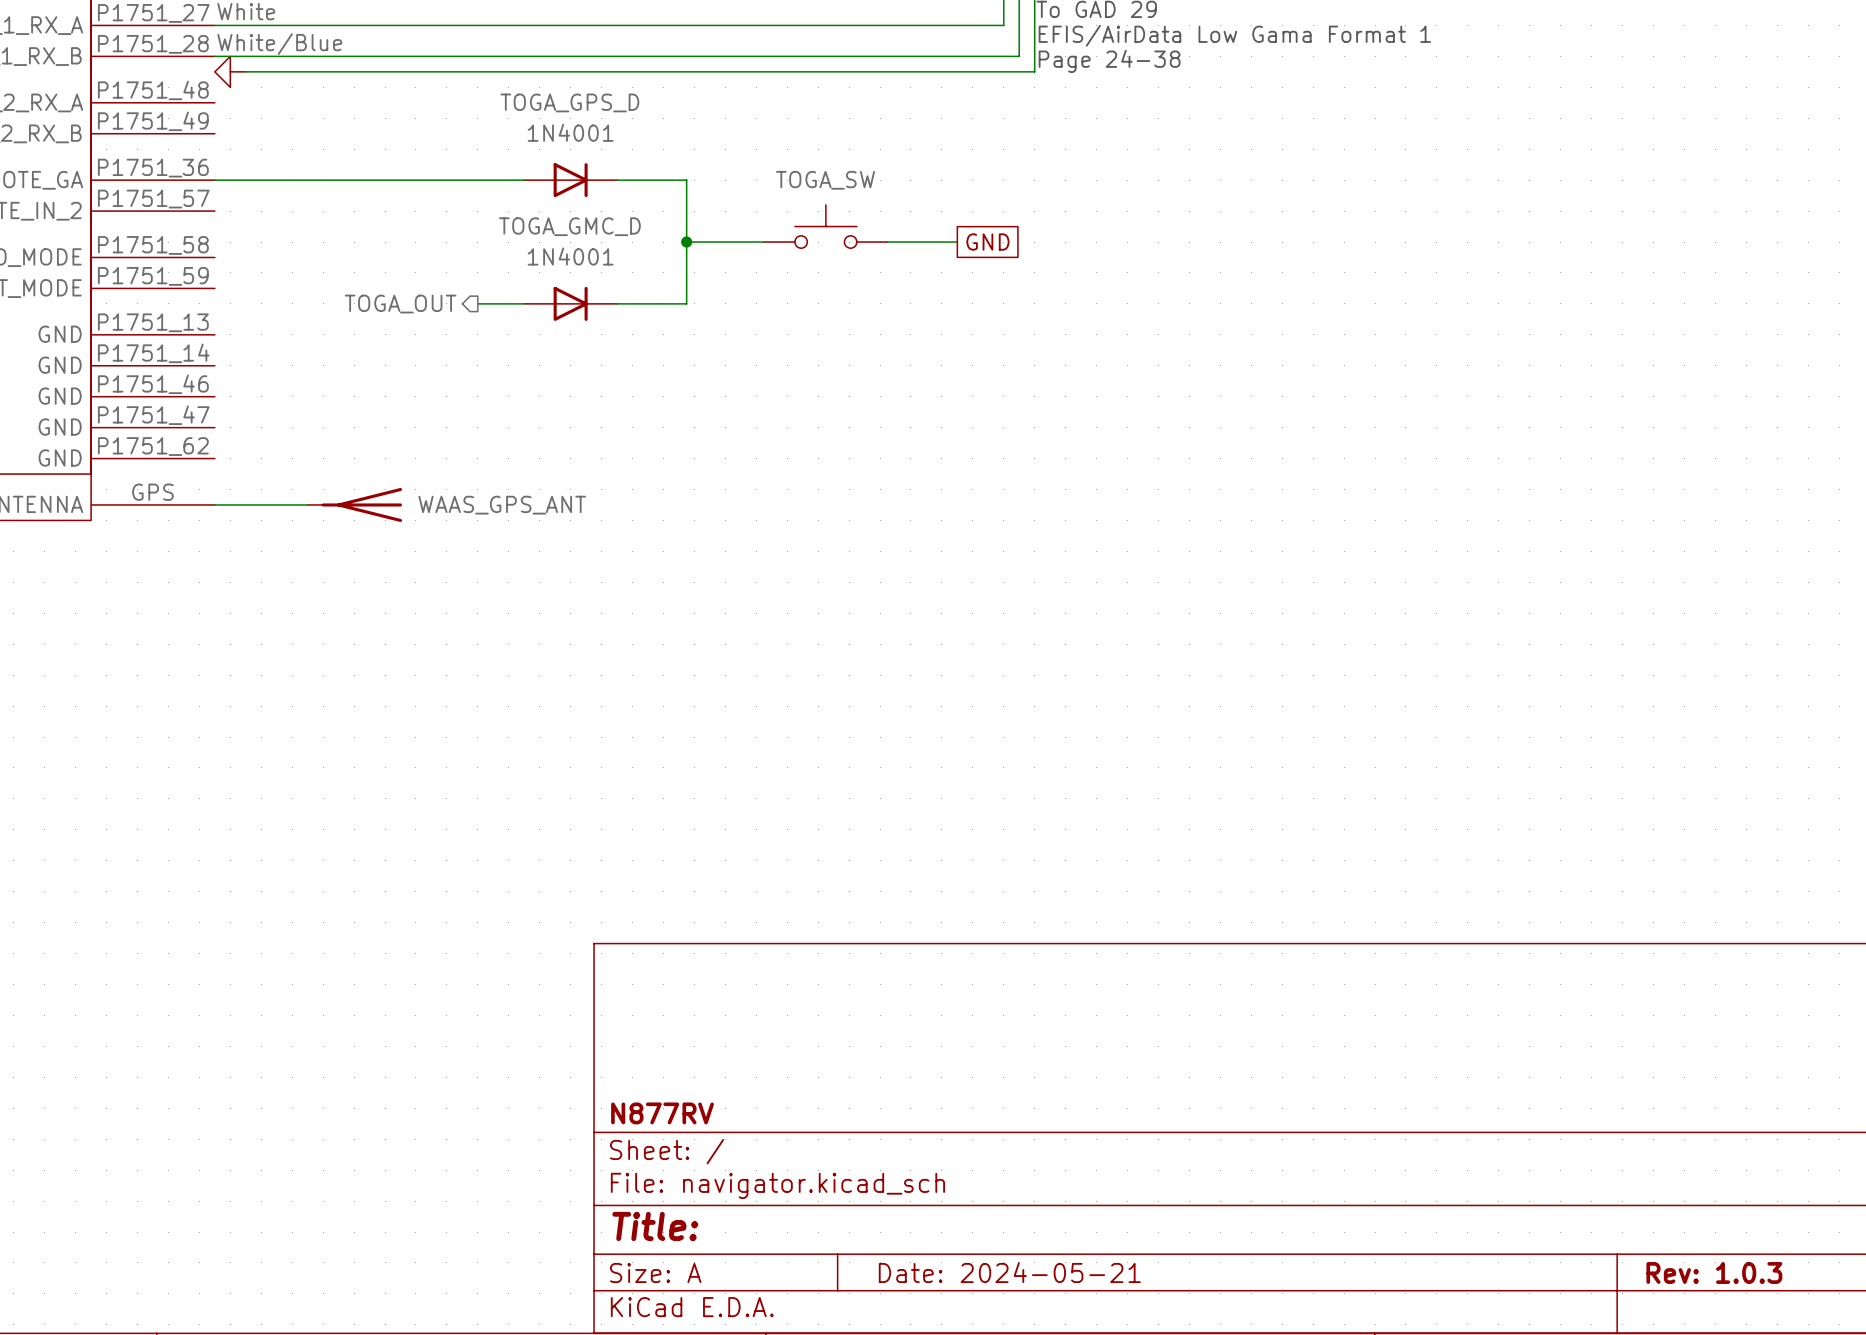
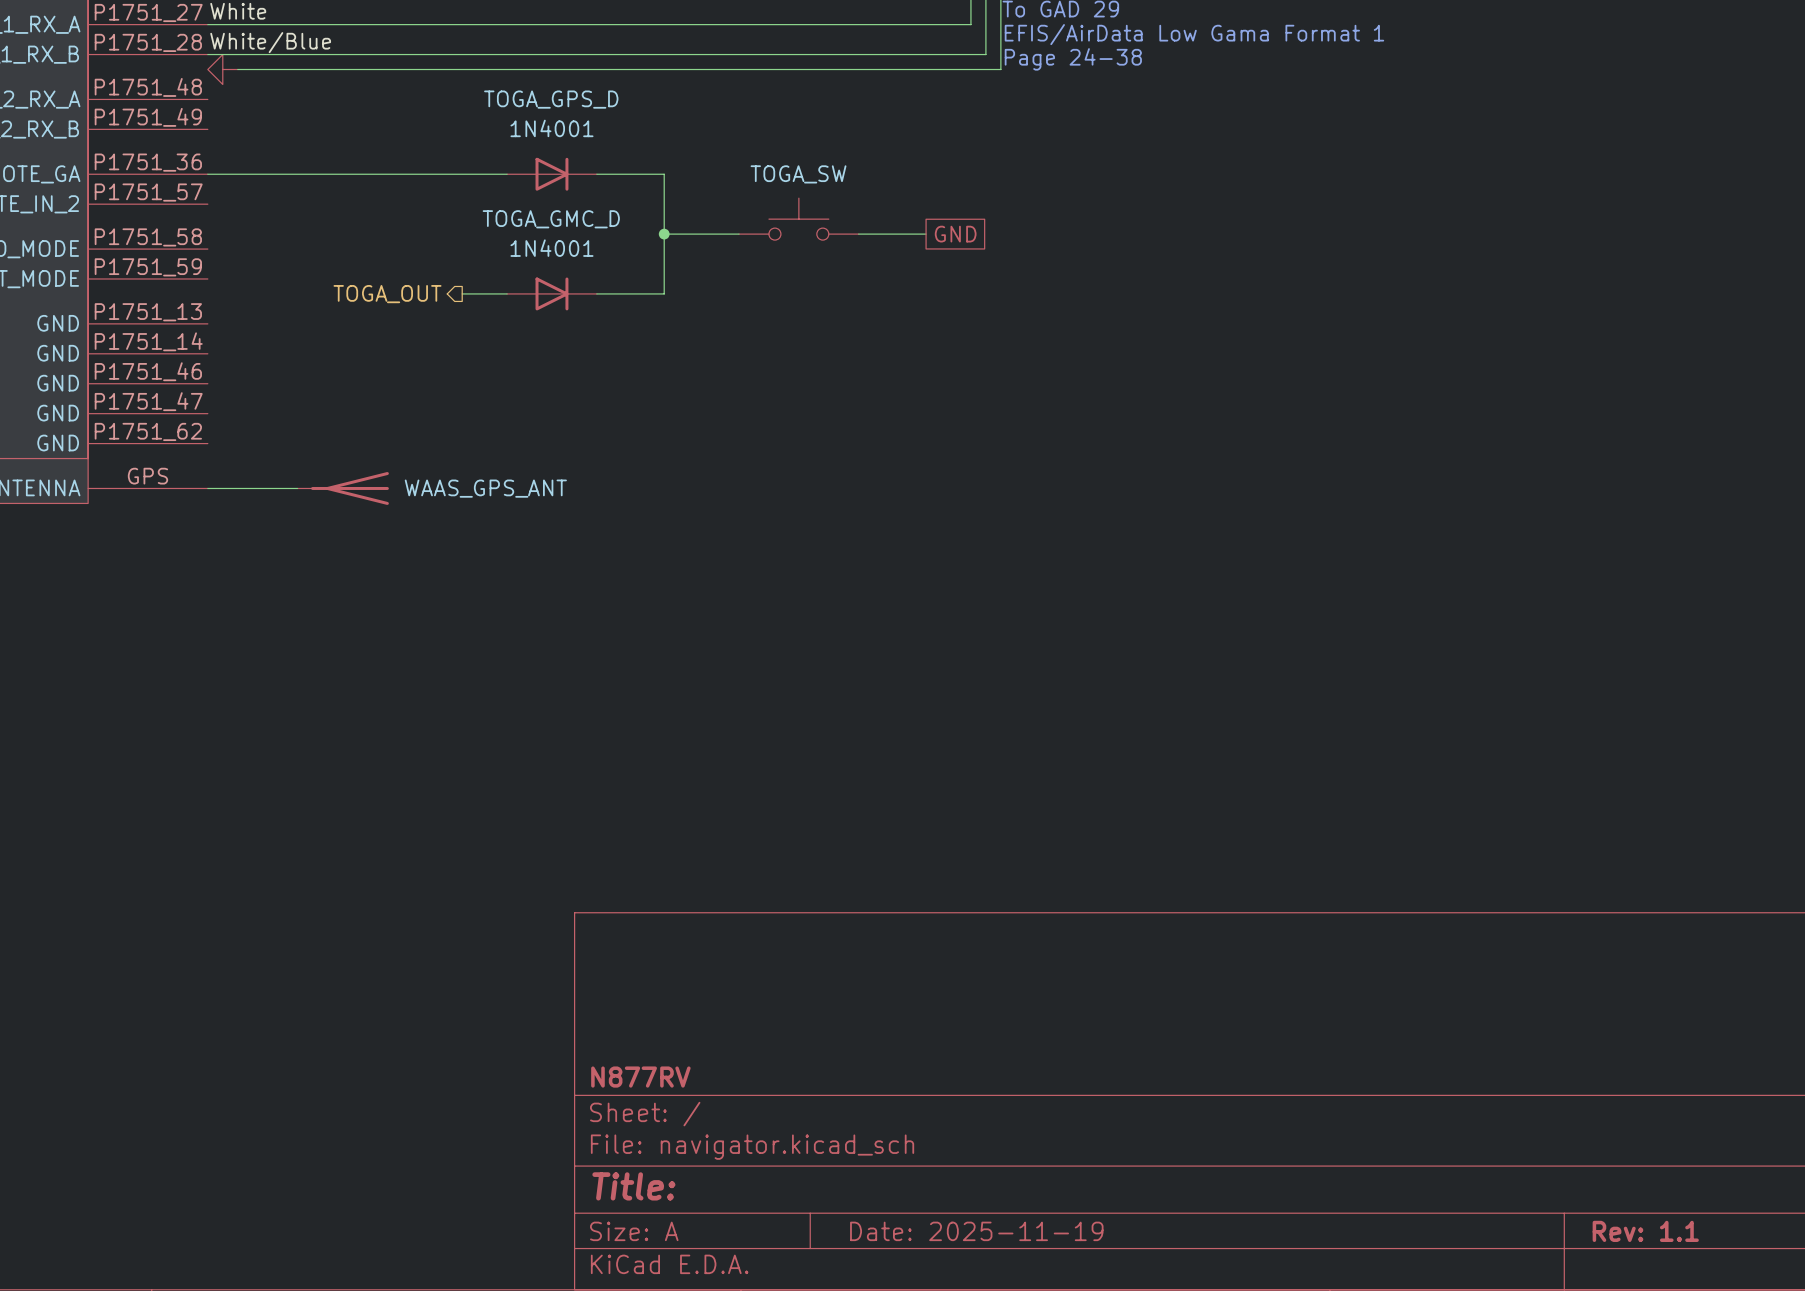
title block: Date: 2024-05-21 (1009, 1272) -> Date: 2025-11-19 (976, 1231)
title block: Rev: 1.0.3 (1714, 1272) -> Rev: 1.1 (1645, 1231)

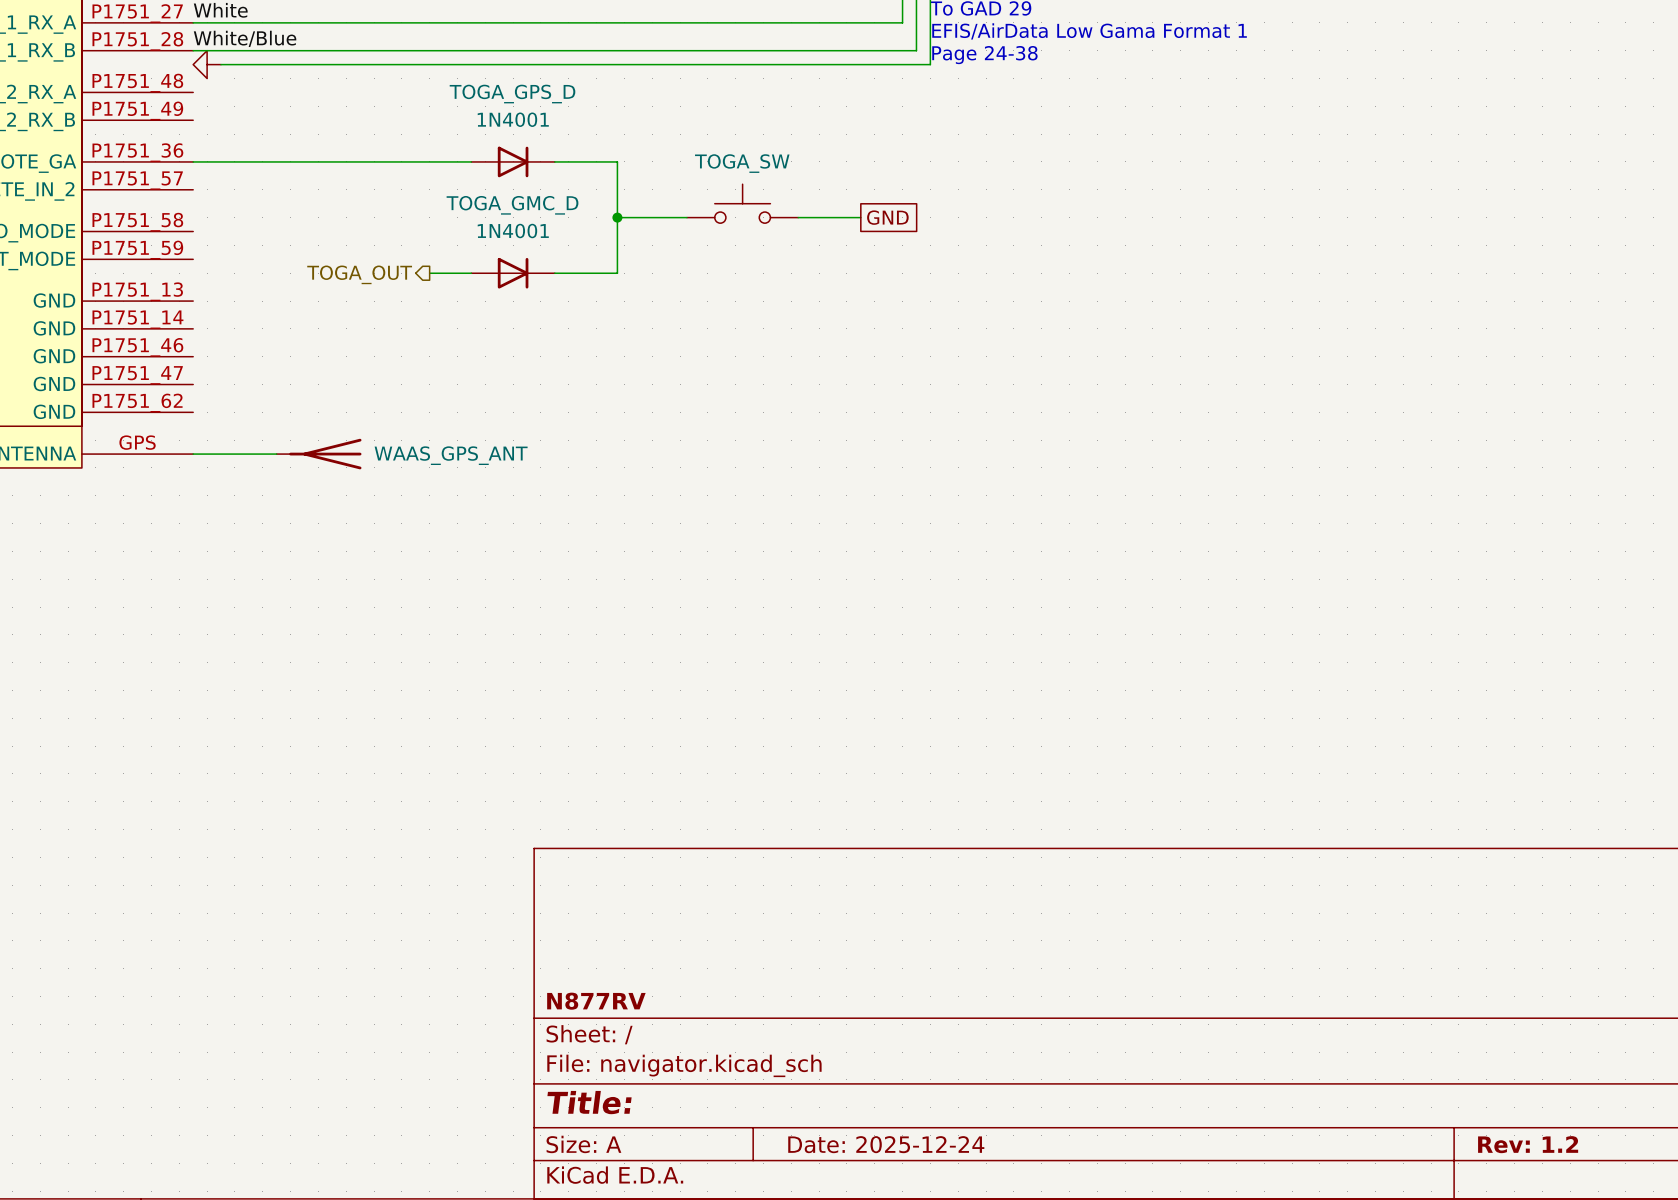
title block: Date: 2025-11-19 (976, 1231) -> Date: 2025-12-24 (886, 1144)
title block: Rev: 1.1 (1645, 1231) -> Rev: 1.2 (1528, 1144)

